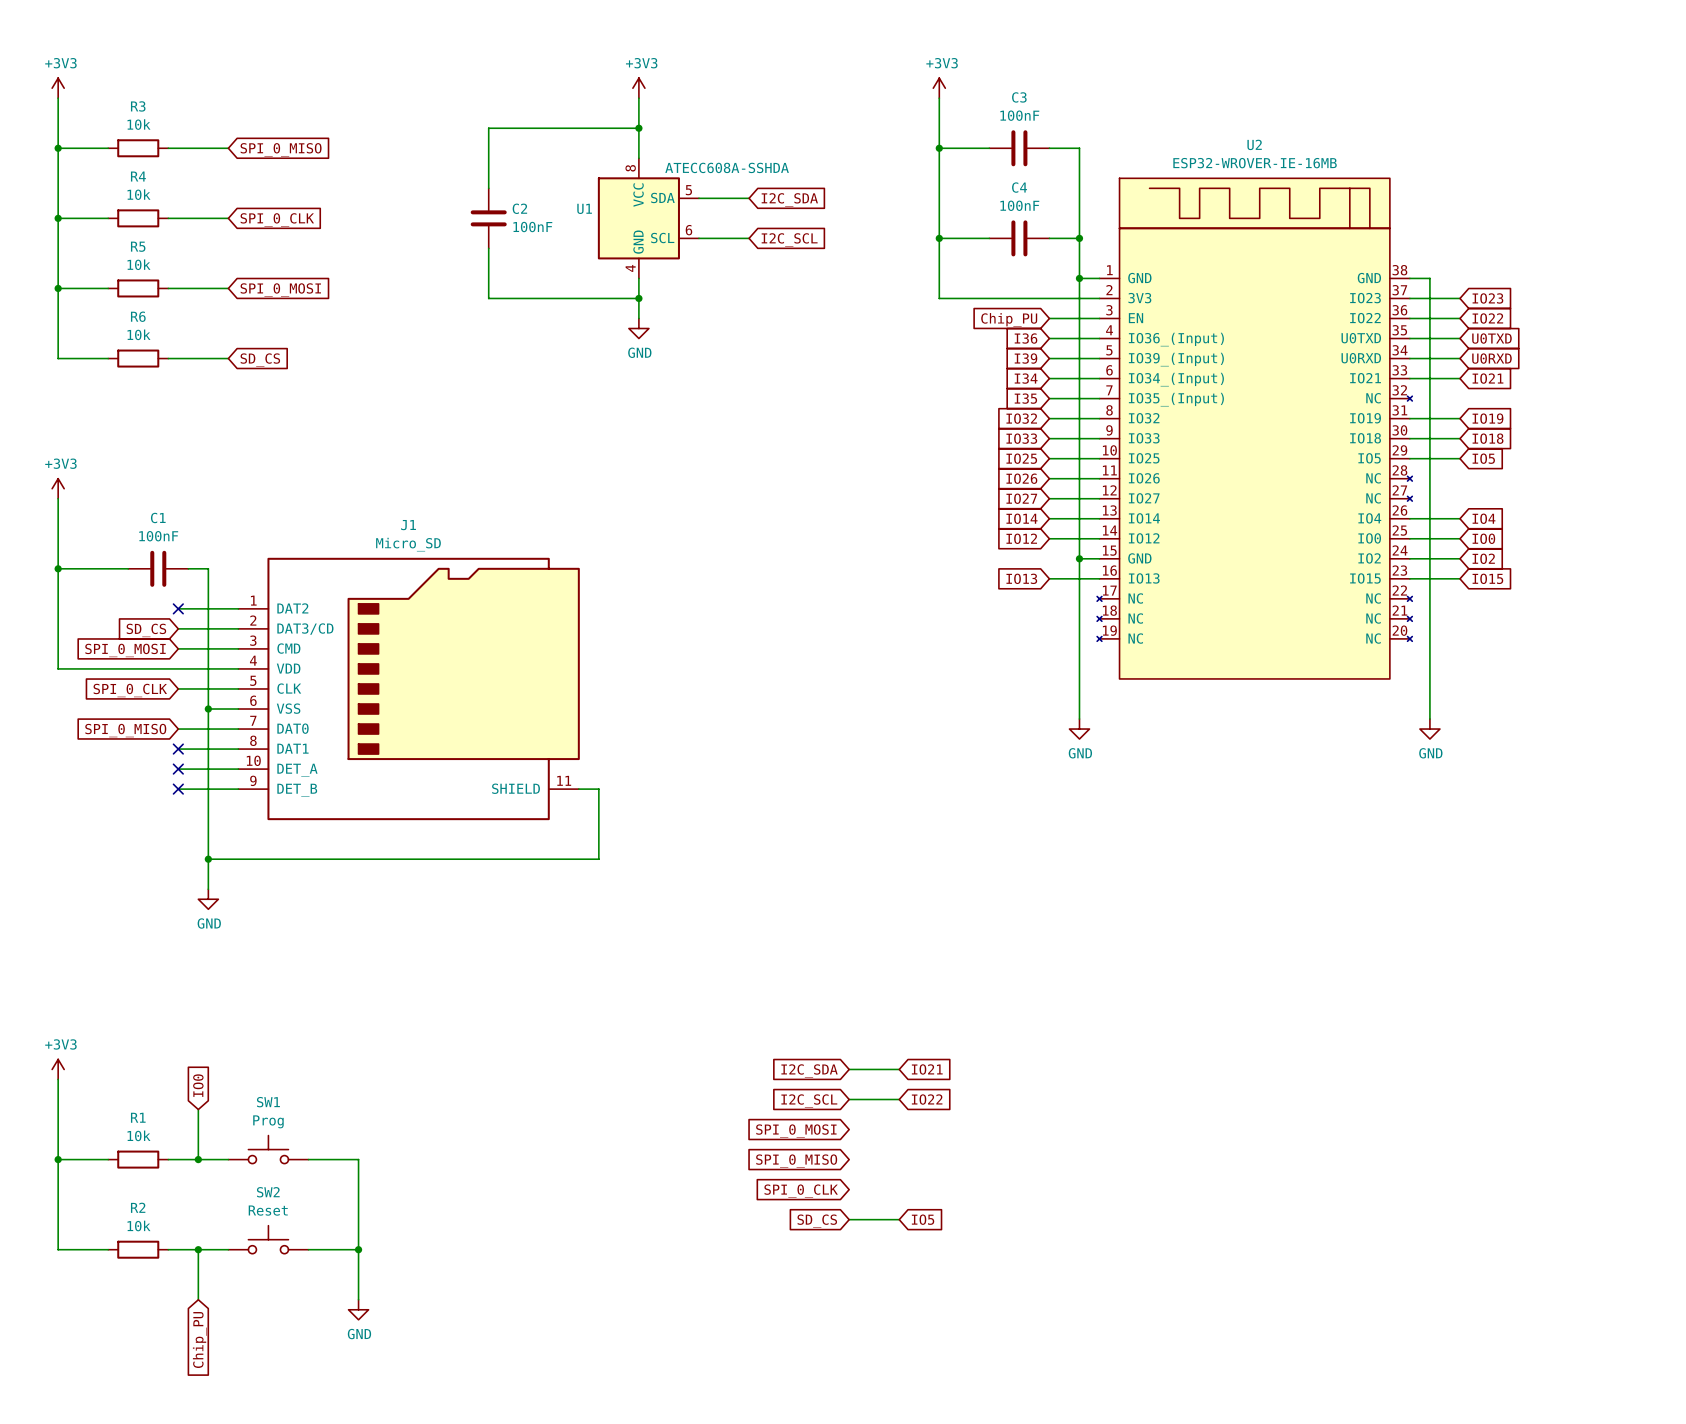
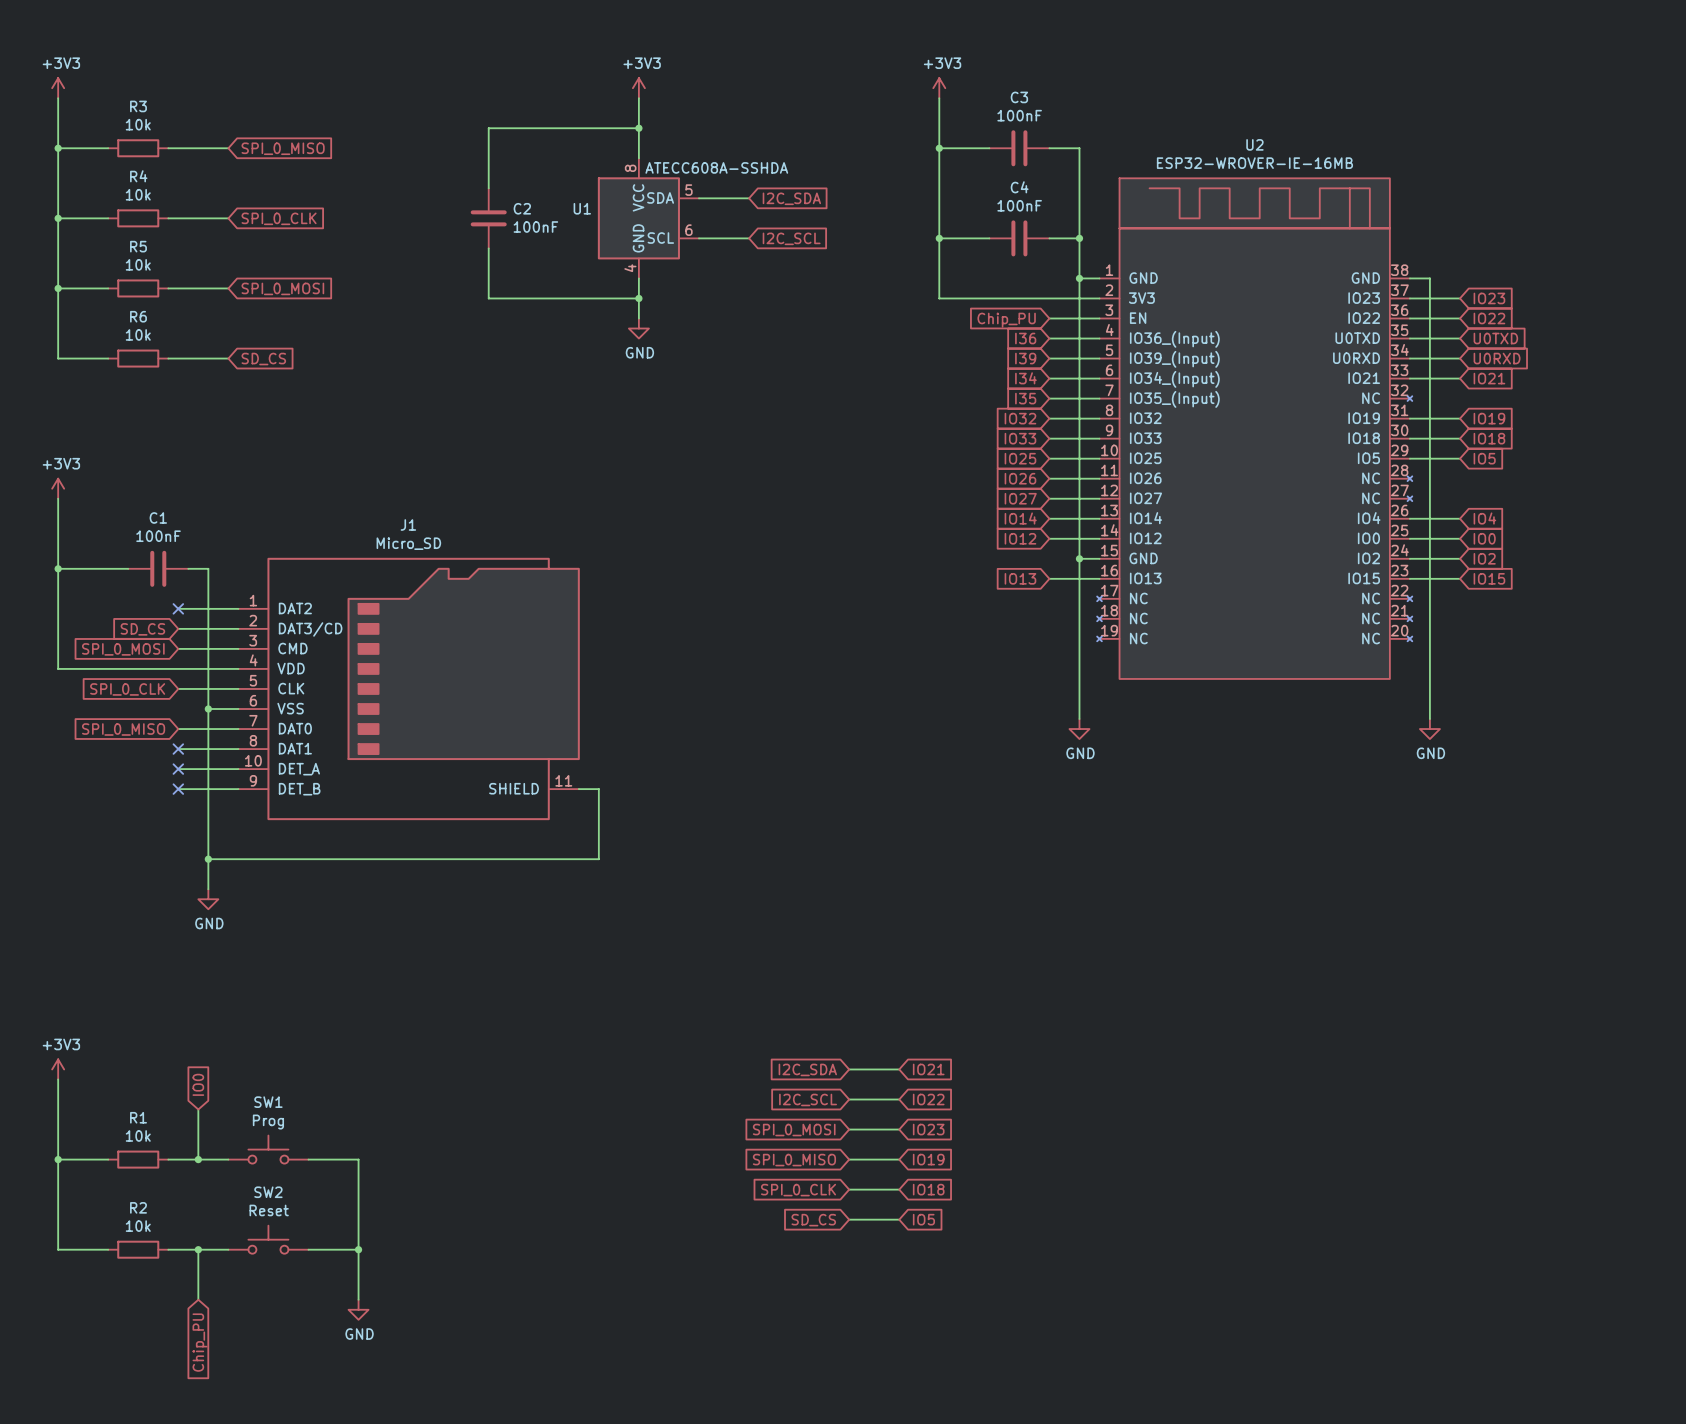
wire: none -> (849, 1129) (899, 1129)
global label: none -> IO23 (928, 1129)
wire: none -> (849, 1159) (899, 1159)
global label: none -> IO19 (928, 1159)
wire: none -> (849, 1189) (899, 1189)
global label: none -> IO18 (928, 1189)

